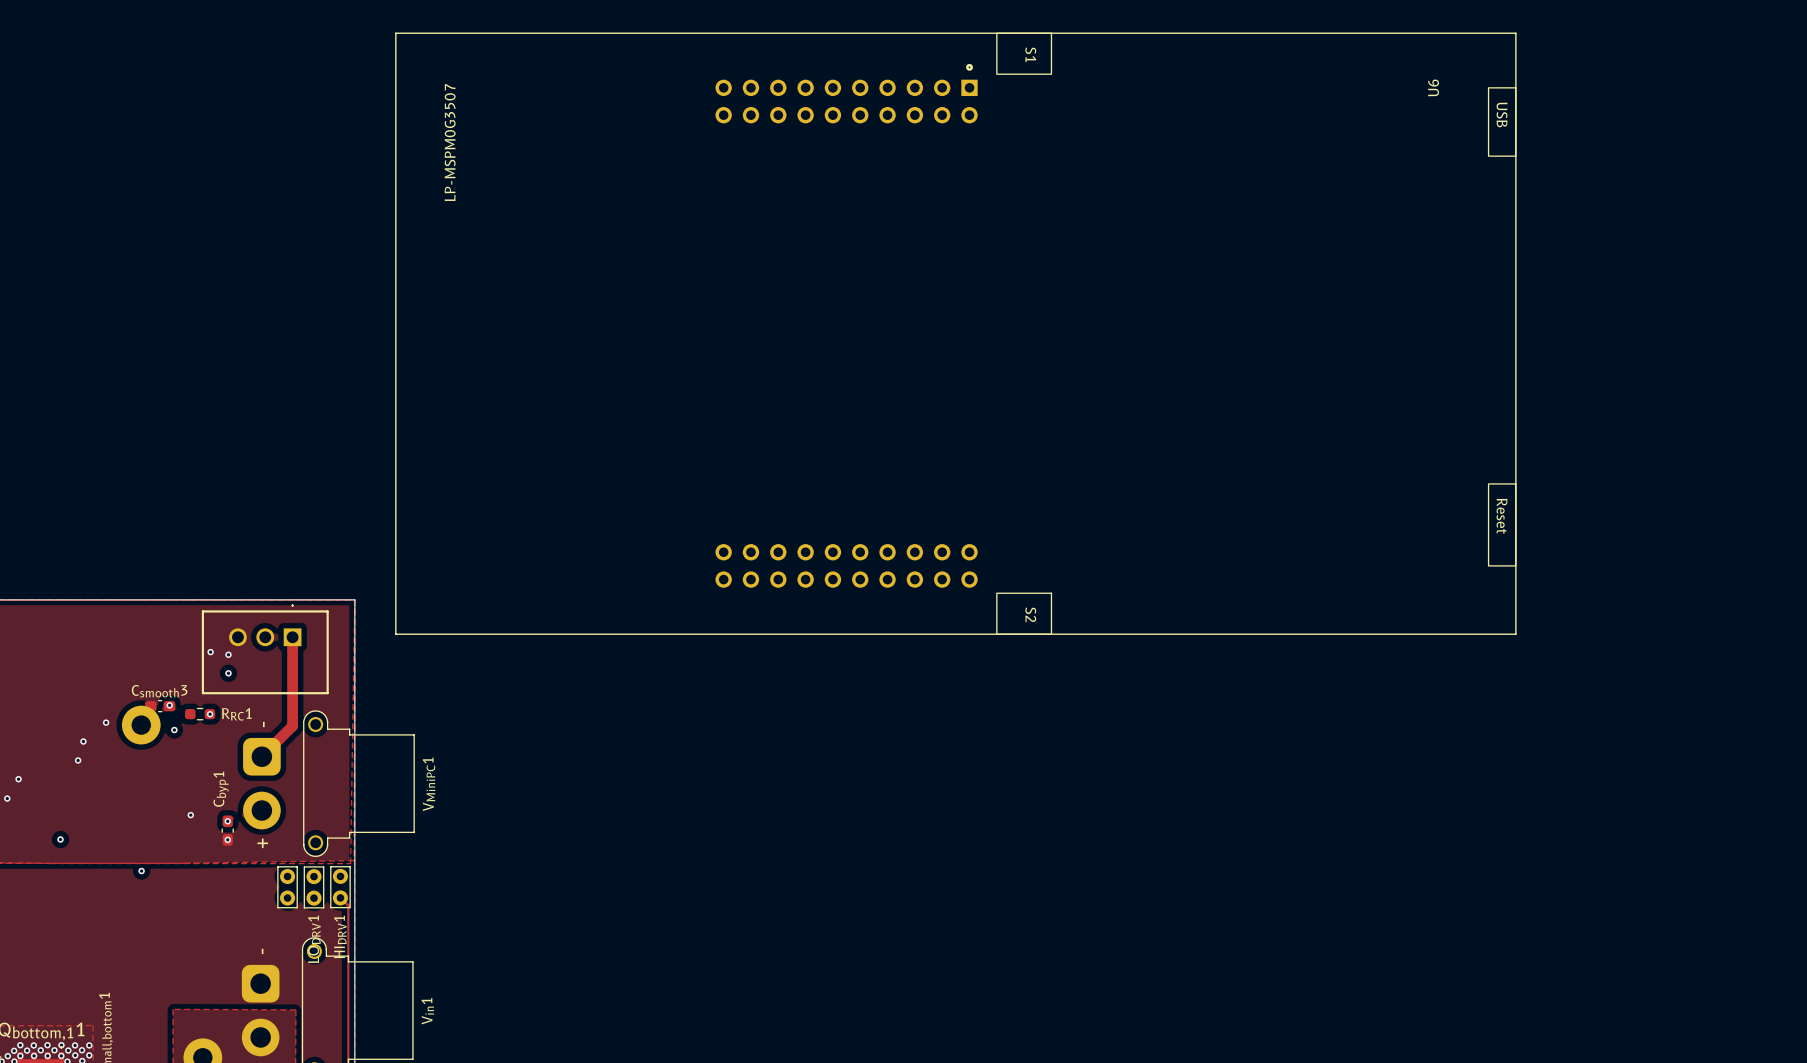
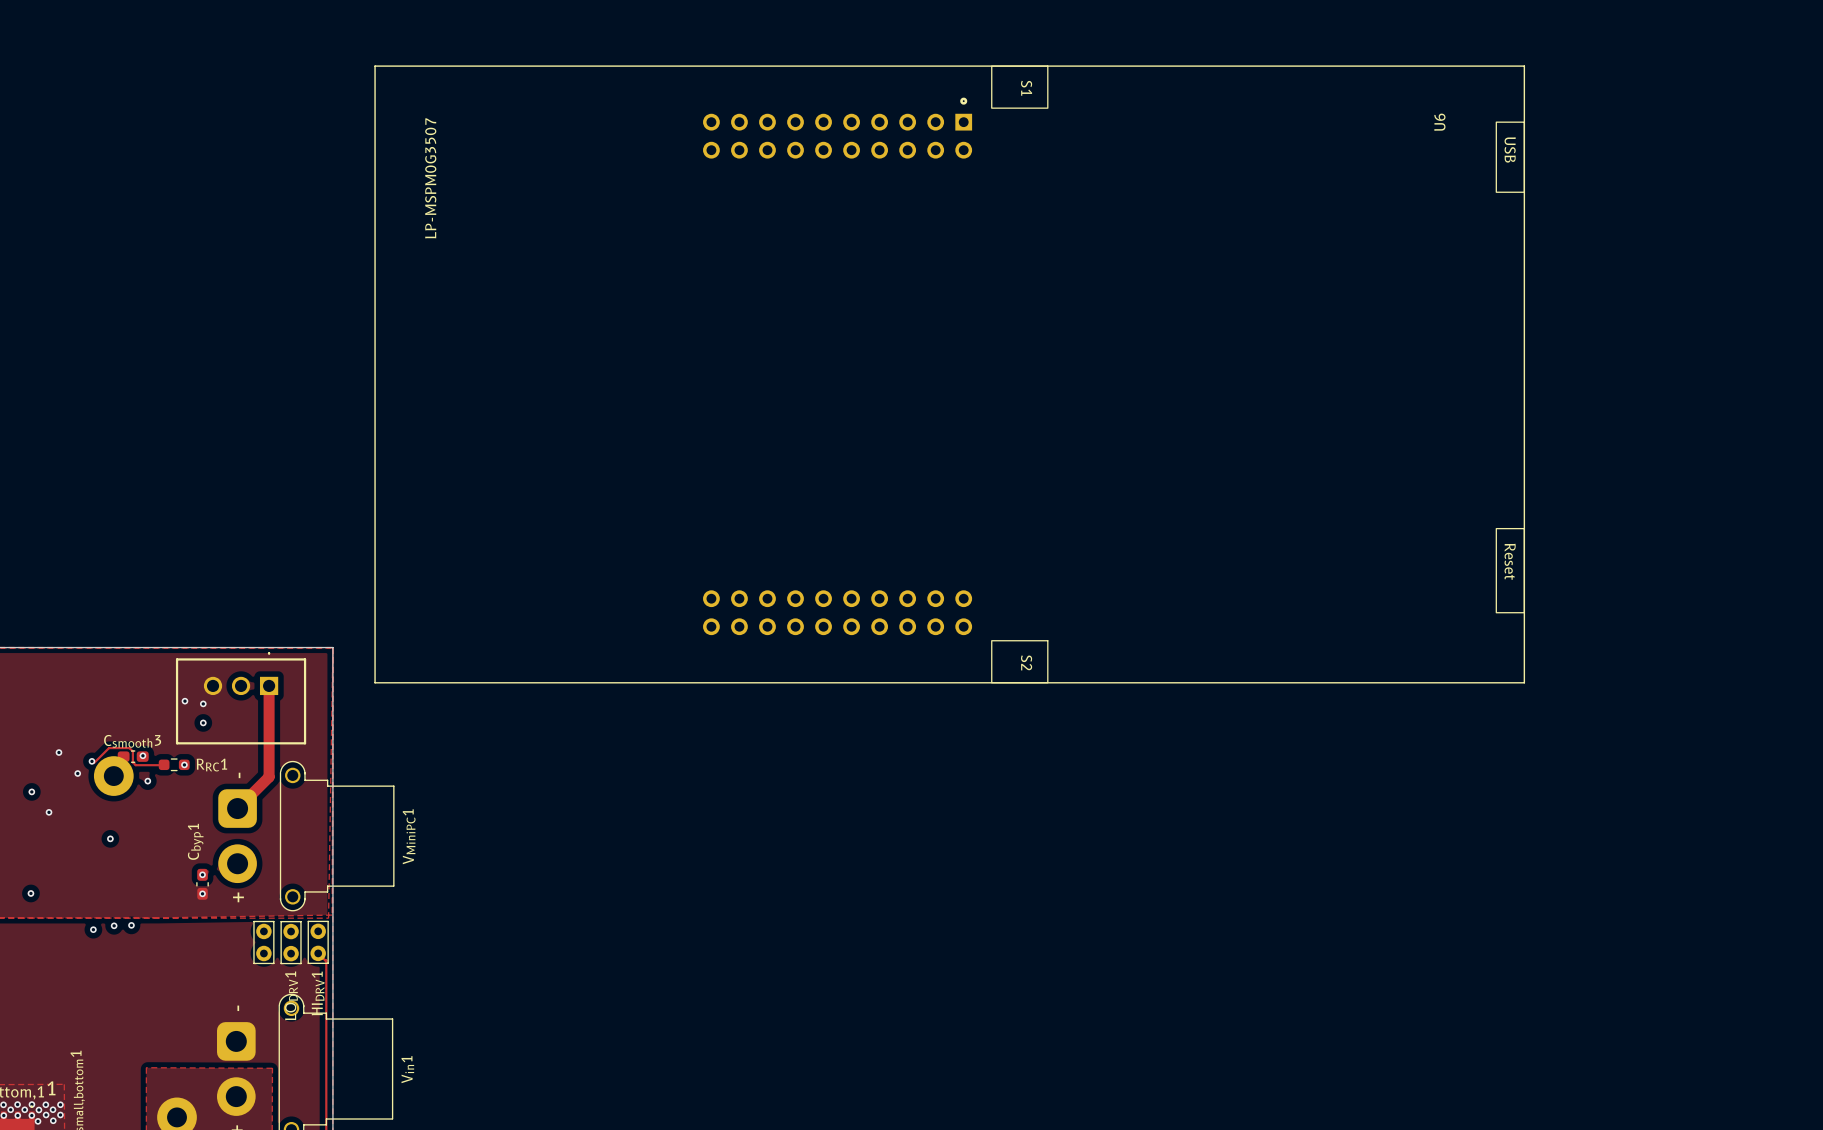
via: none -> (58, 752)
via: none -> (91, 761)
track: none -> (94, 763) (109, 748) (129, 748) (132, 751) (132, 762) (135, 765) (164, 764)
via: none -> (31, 791)
via: (83, 741) -> none
via: none -> (110, 838)
via: (190, 815) -> none
via: none -> (131, 925)
via: none -> (93, 929)

